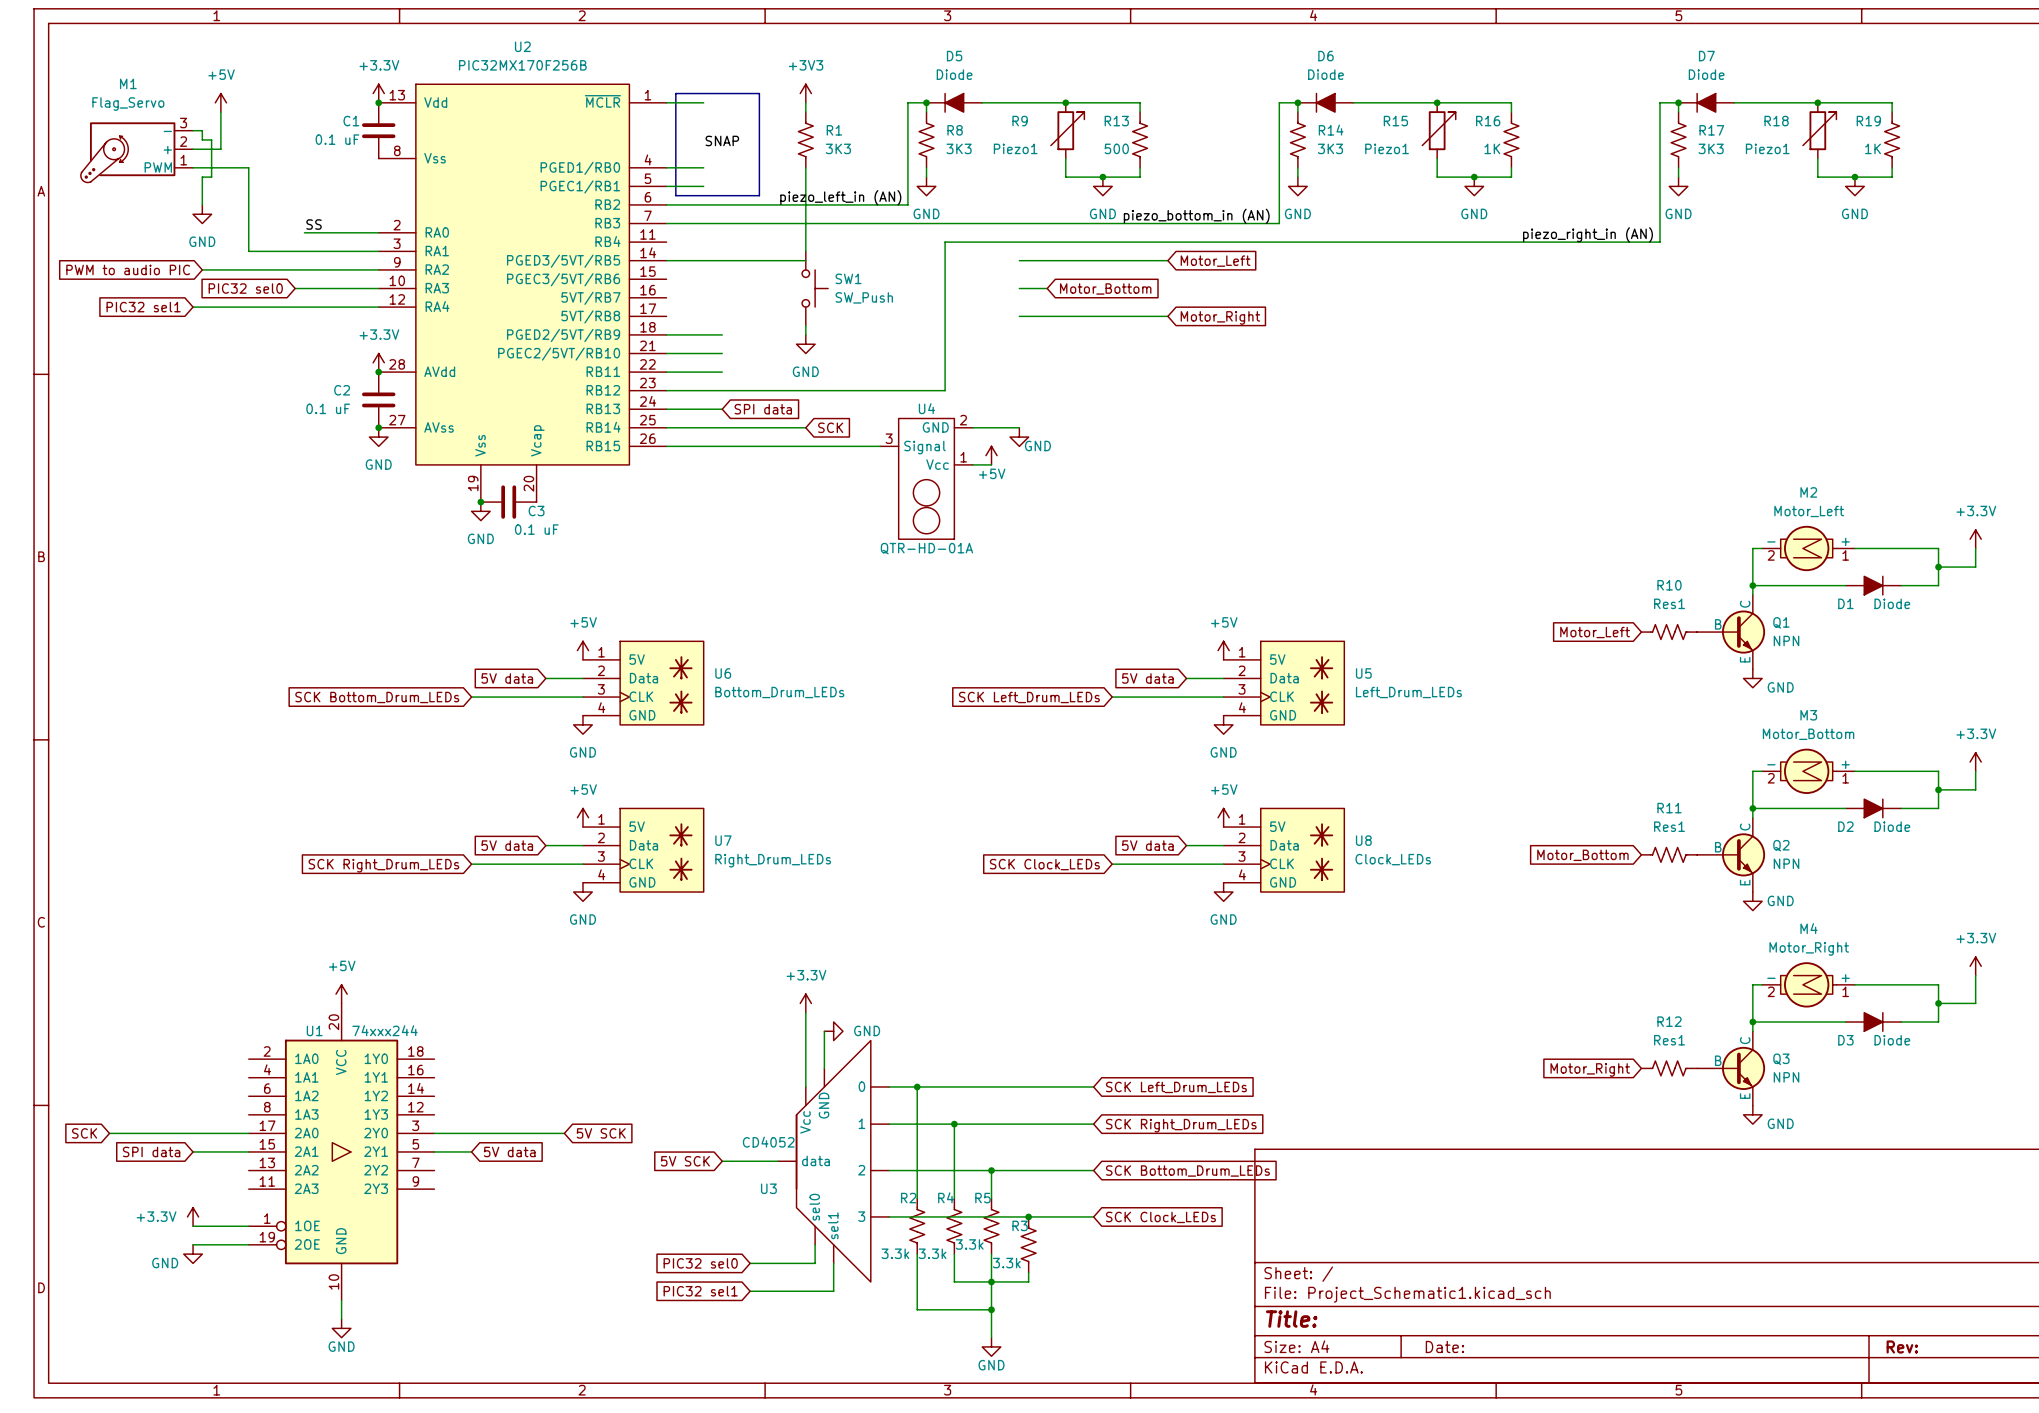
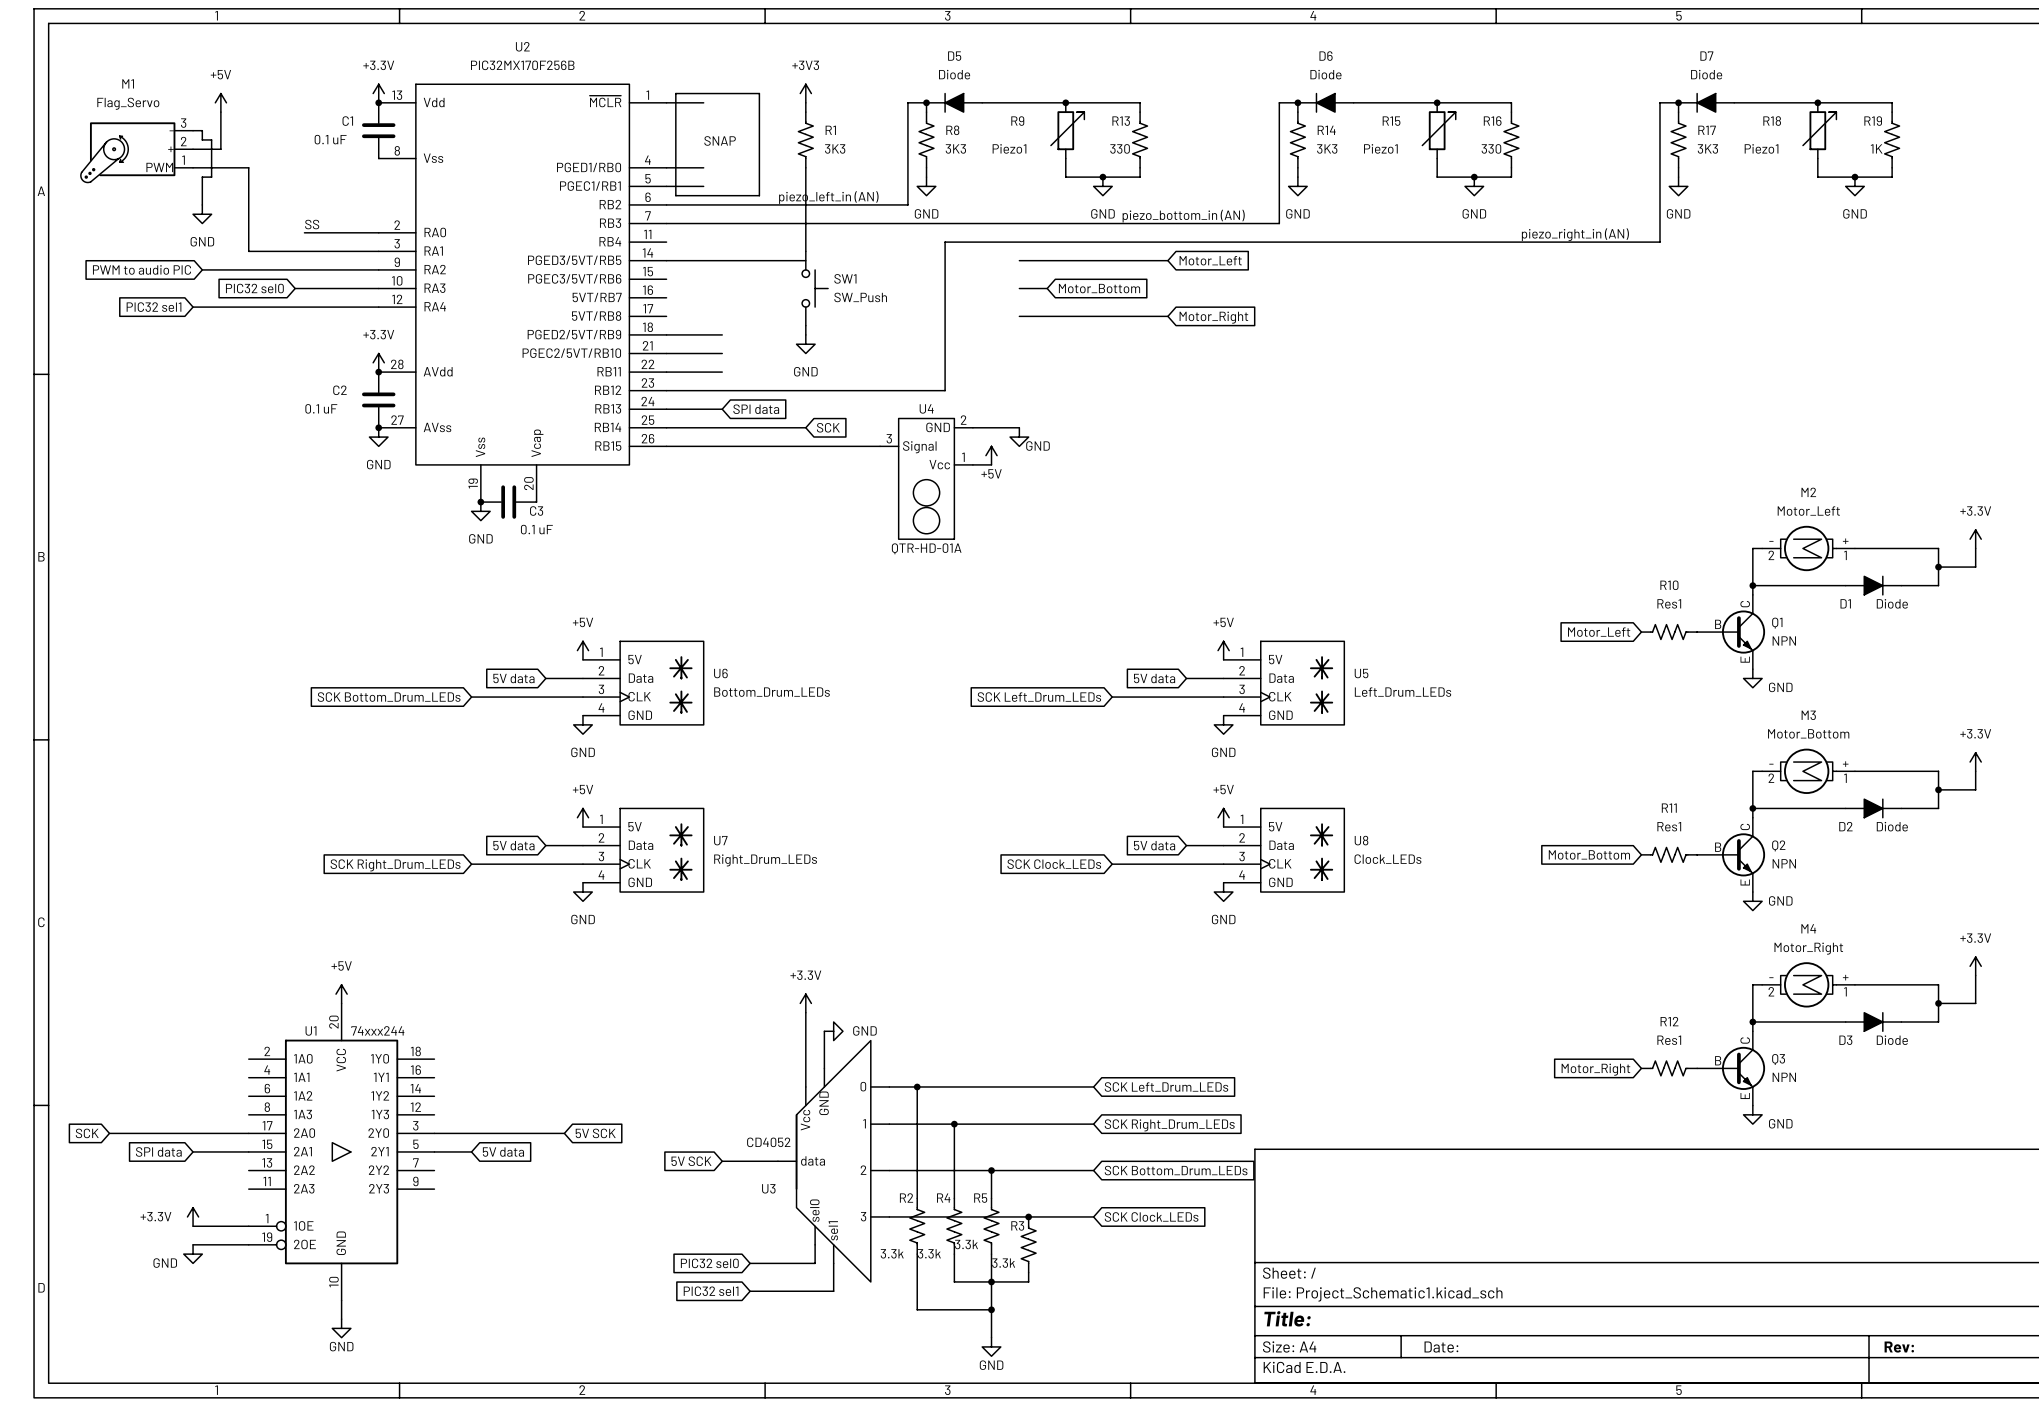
R13 value: 500 (1116, 148) -> 330 (1120, 148)
R16 value: 1K (1492, 148) -> 330 (1491, 148)

